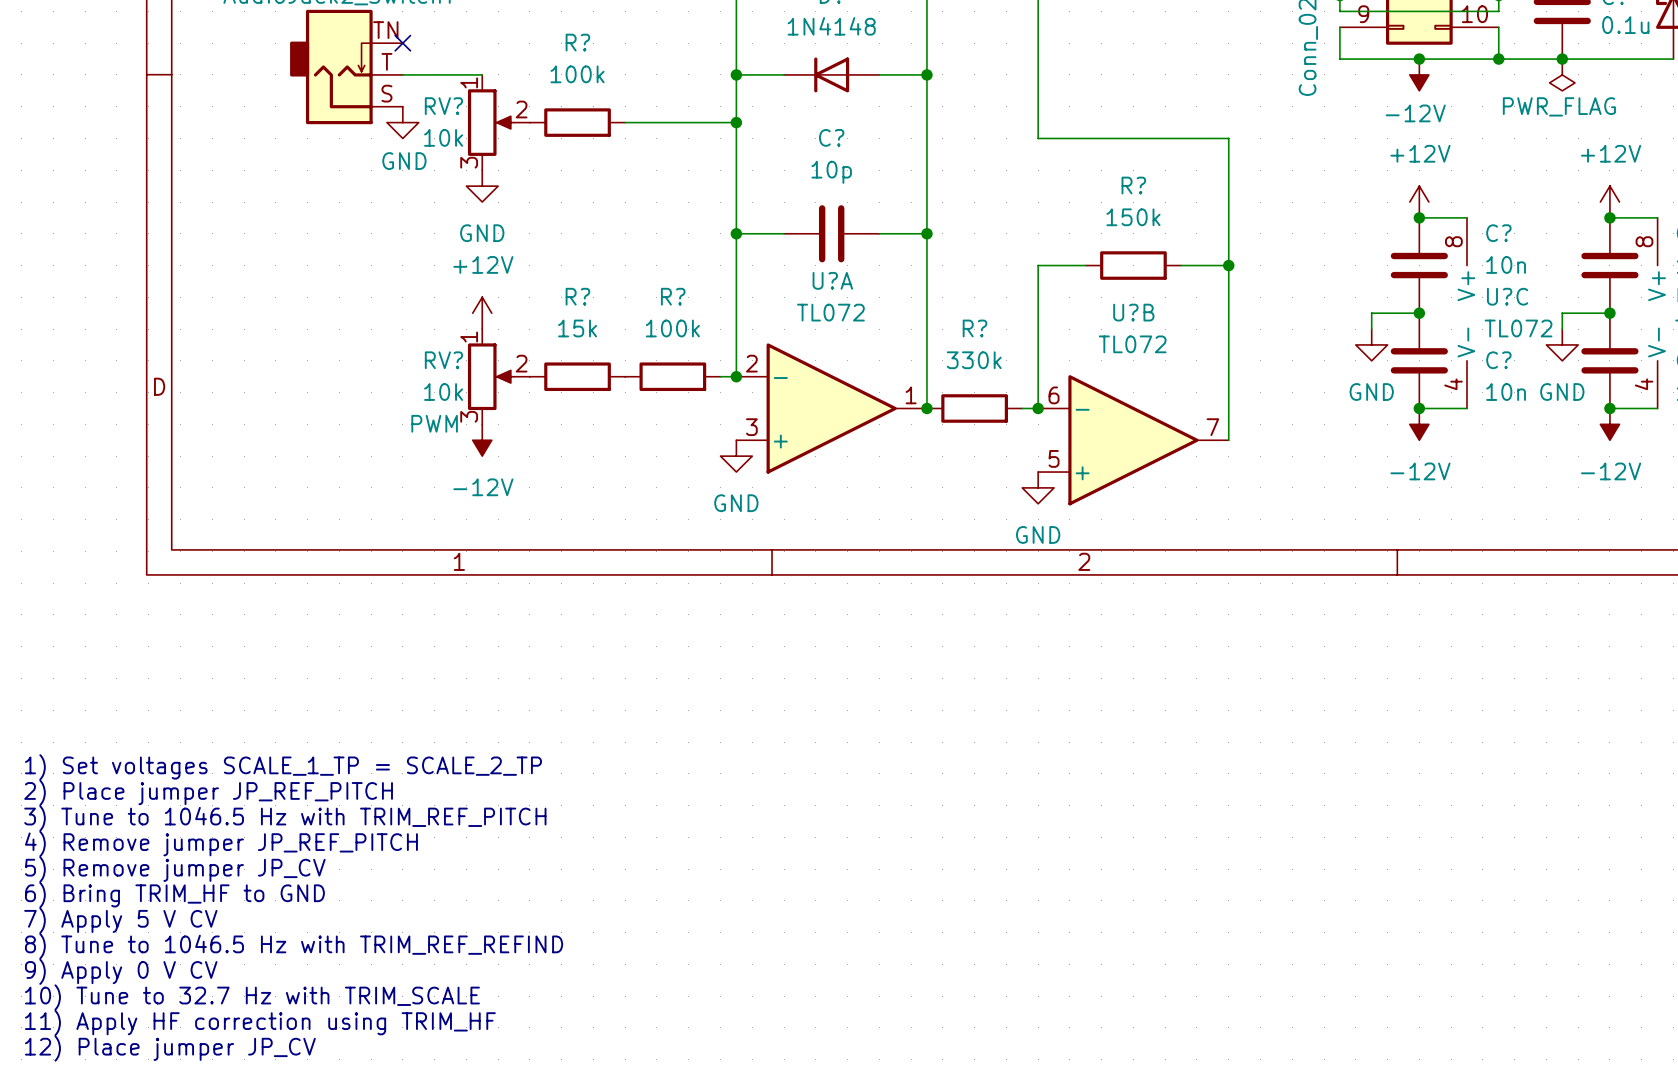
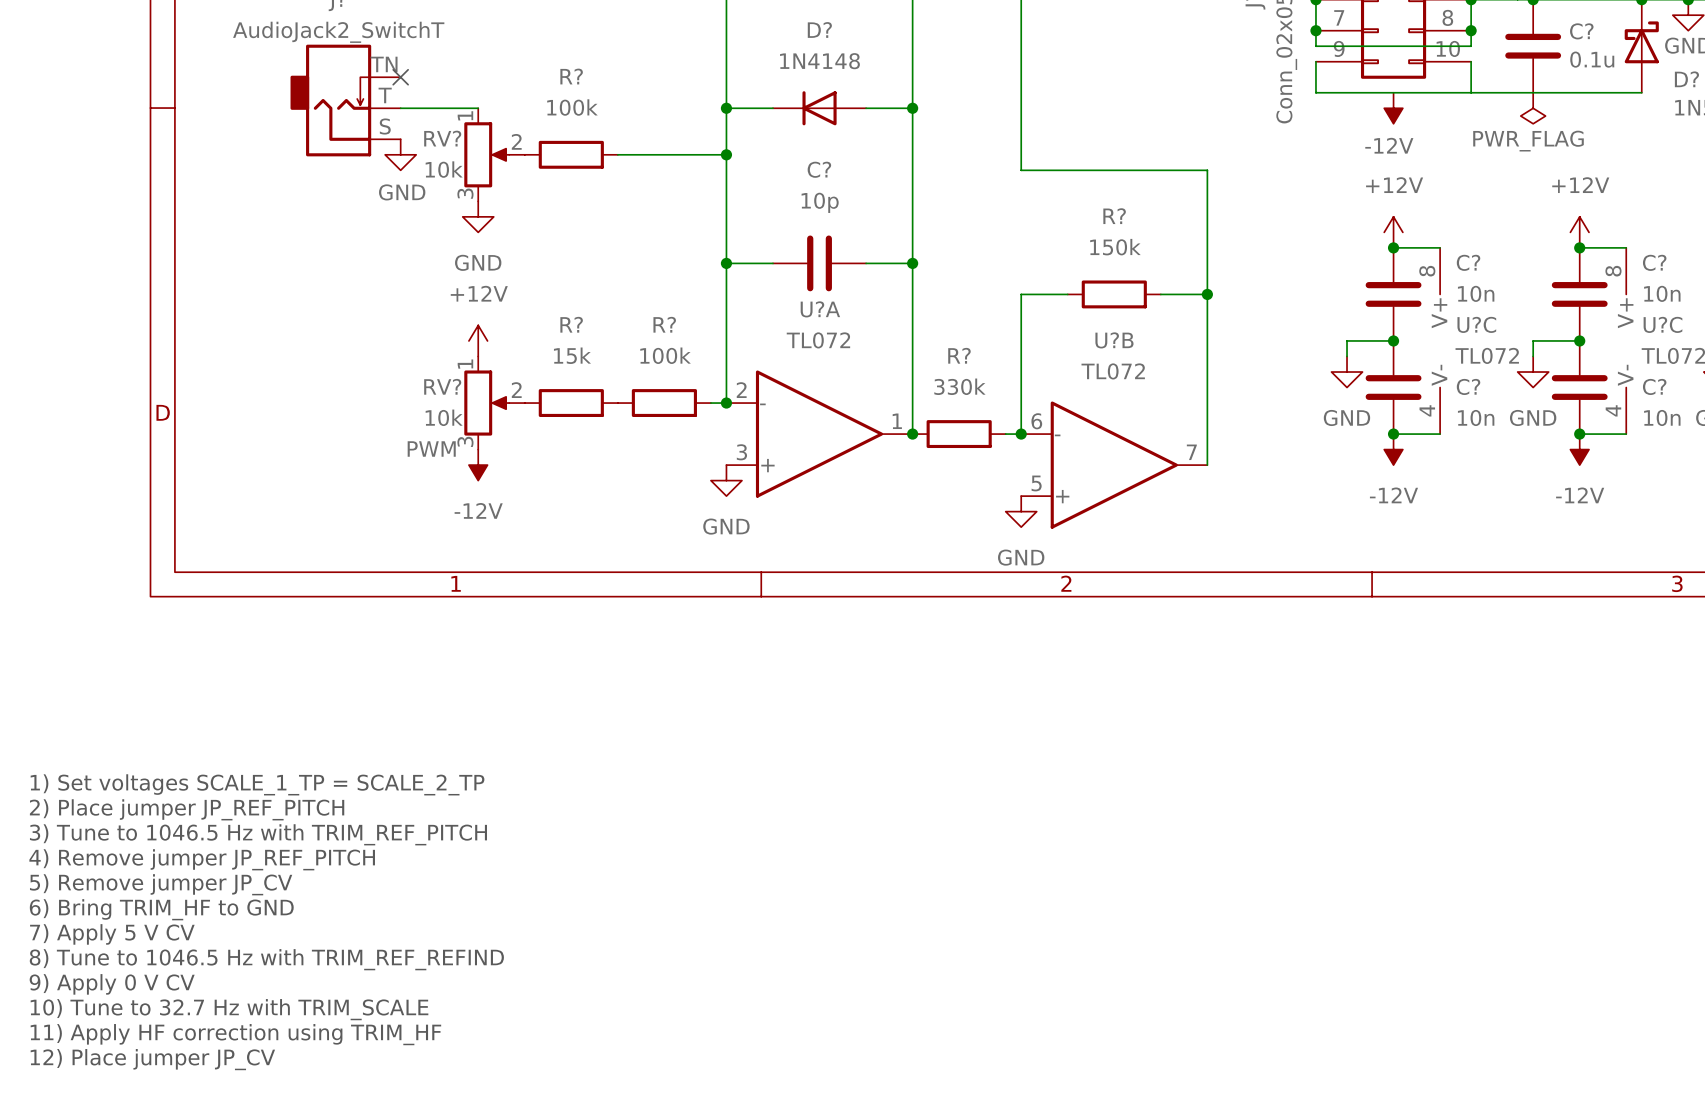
junction: (1419, 59) -> none
junction: (1498, 59) -> none
junction: (1562, 59) -> none

